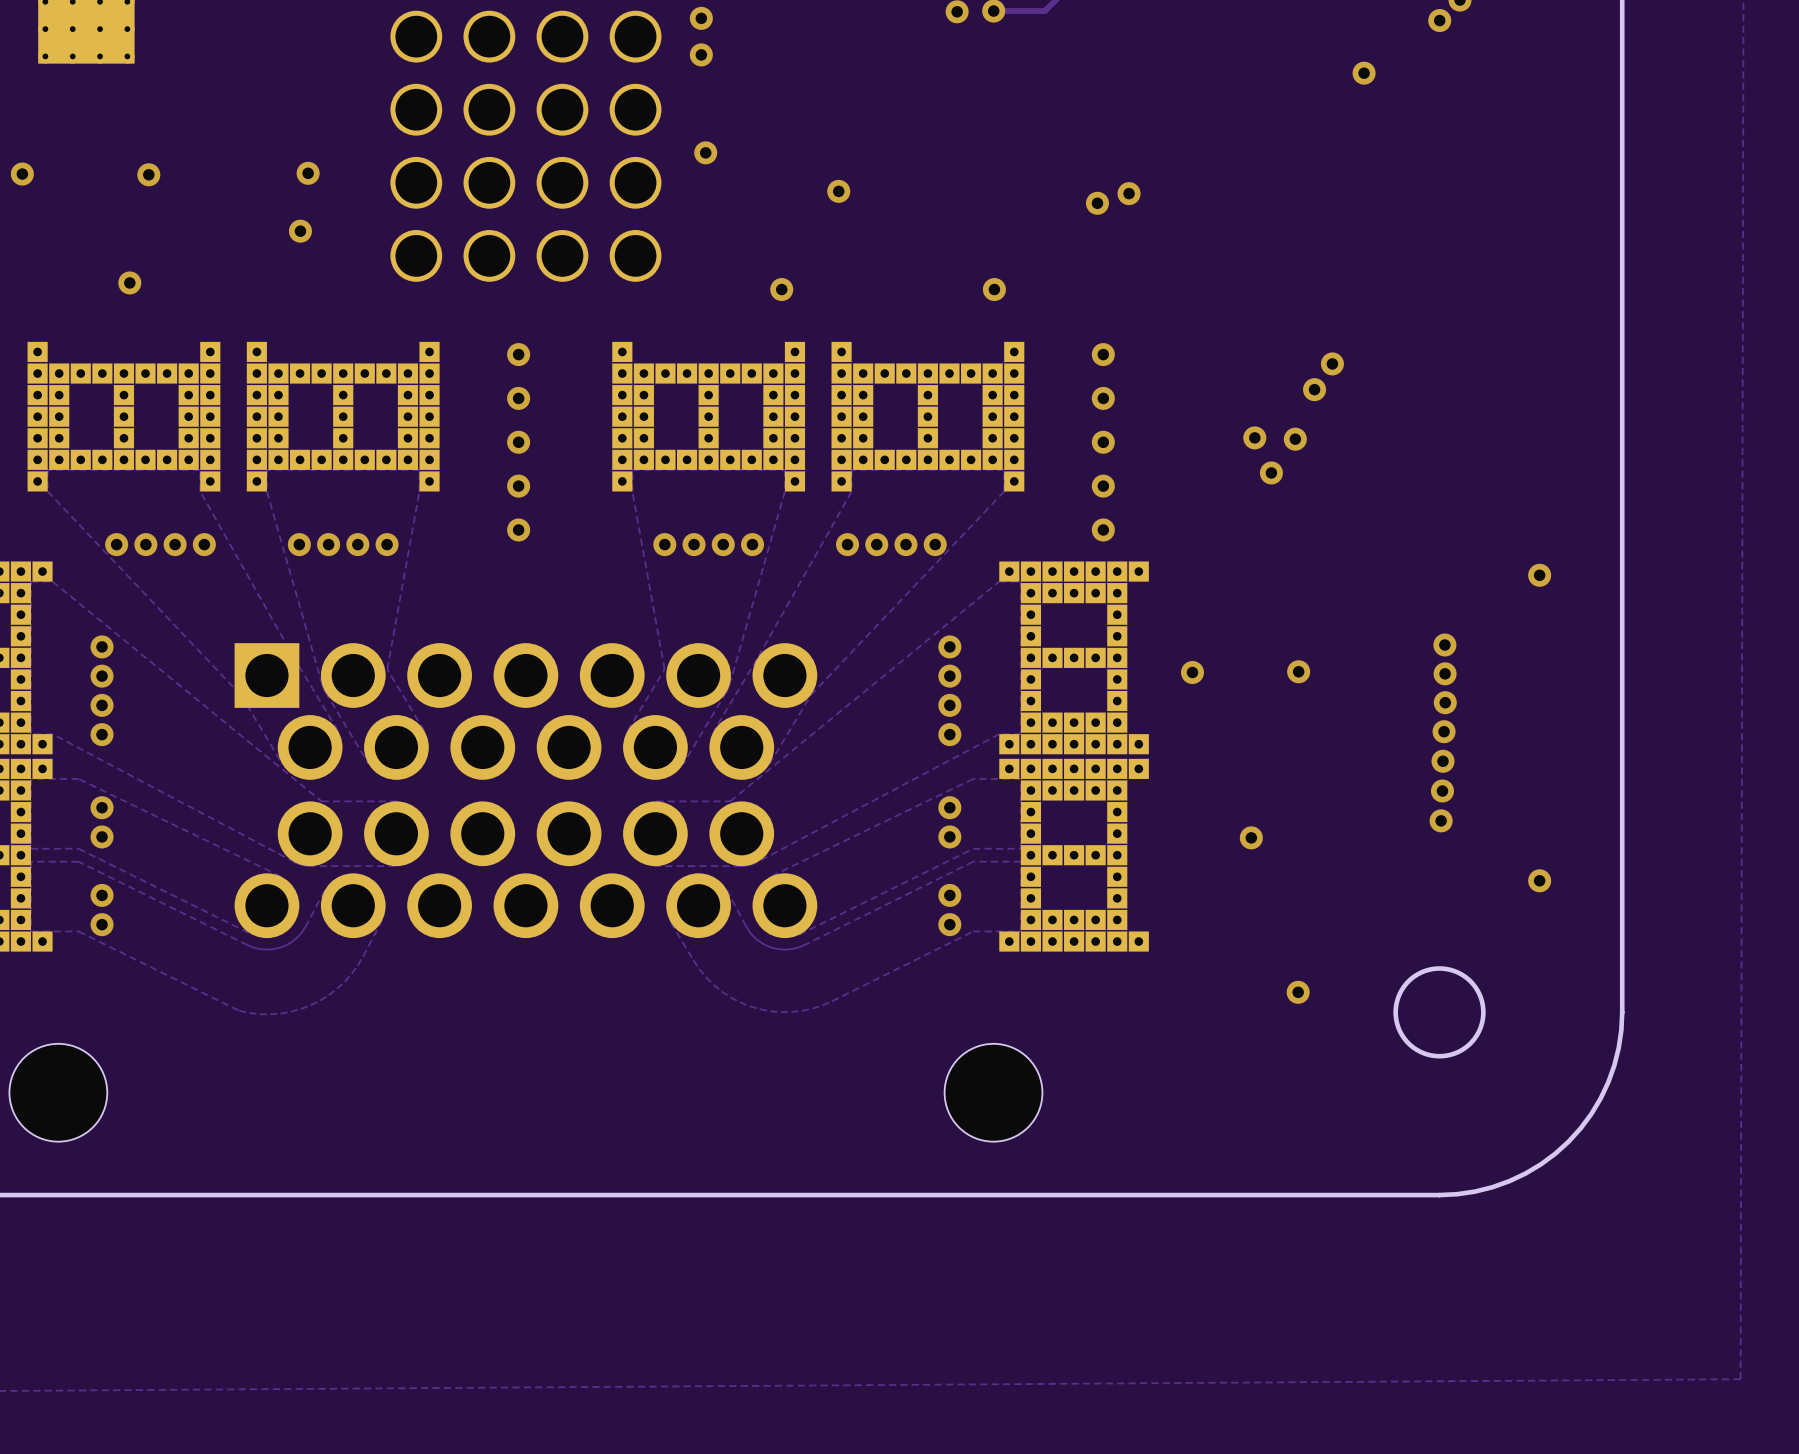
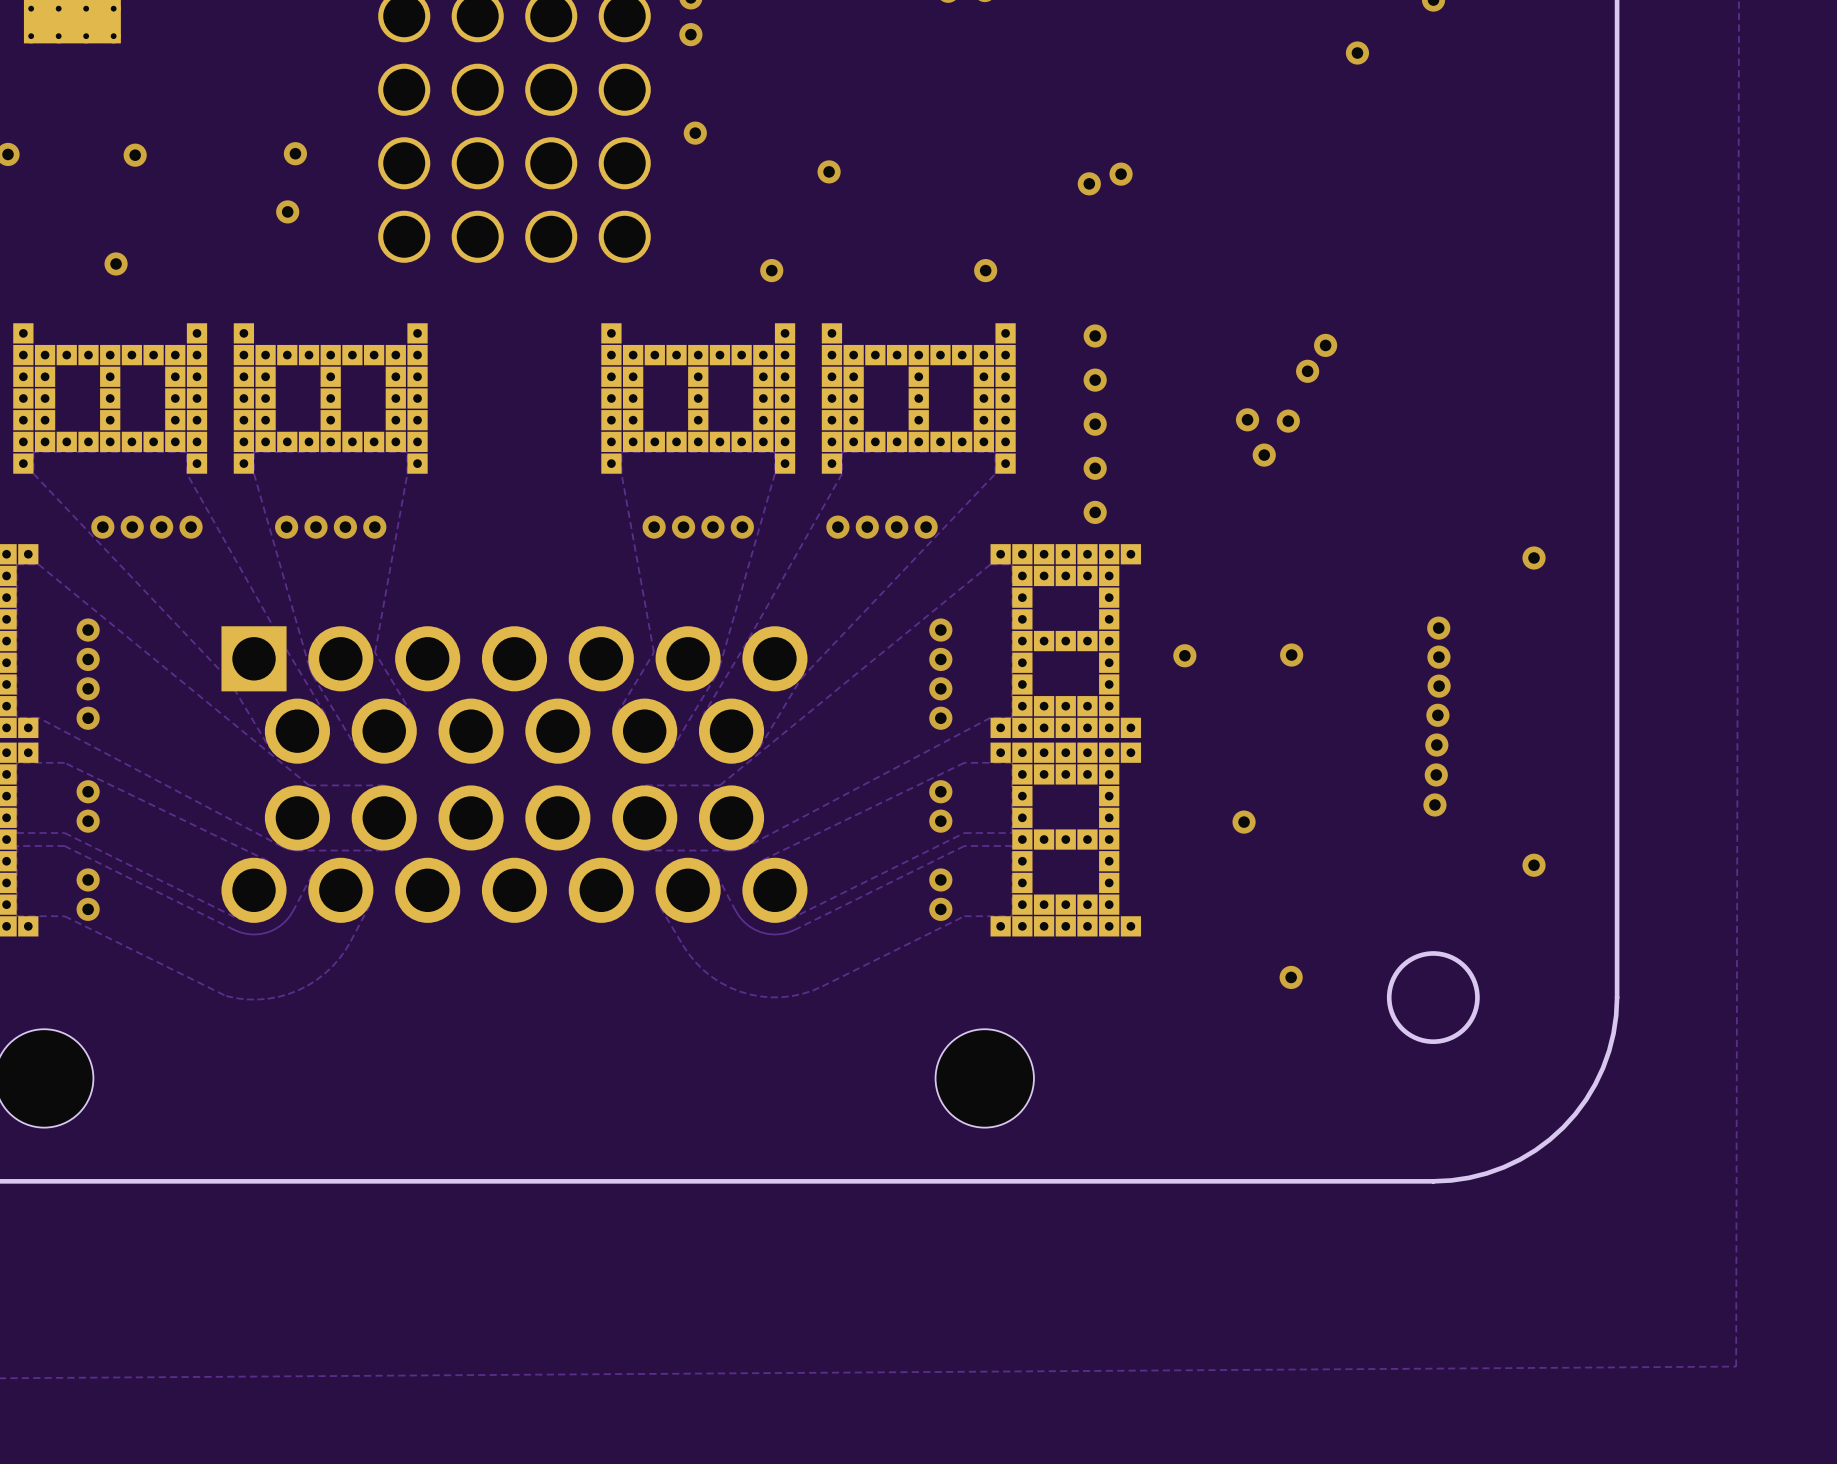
via: (518, 354) -> none
via: (518, 398) -> none
via: (518, 442) -> none
via: (518, 486) -> none
via: (518, 529) -> none

